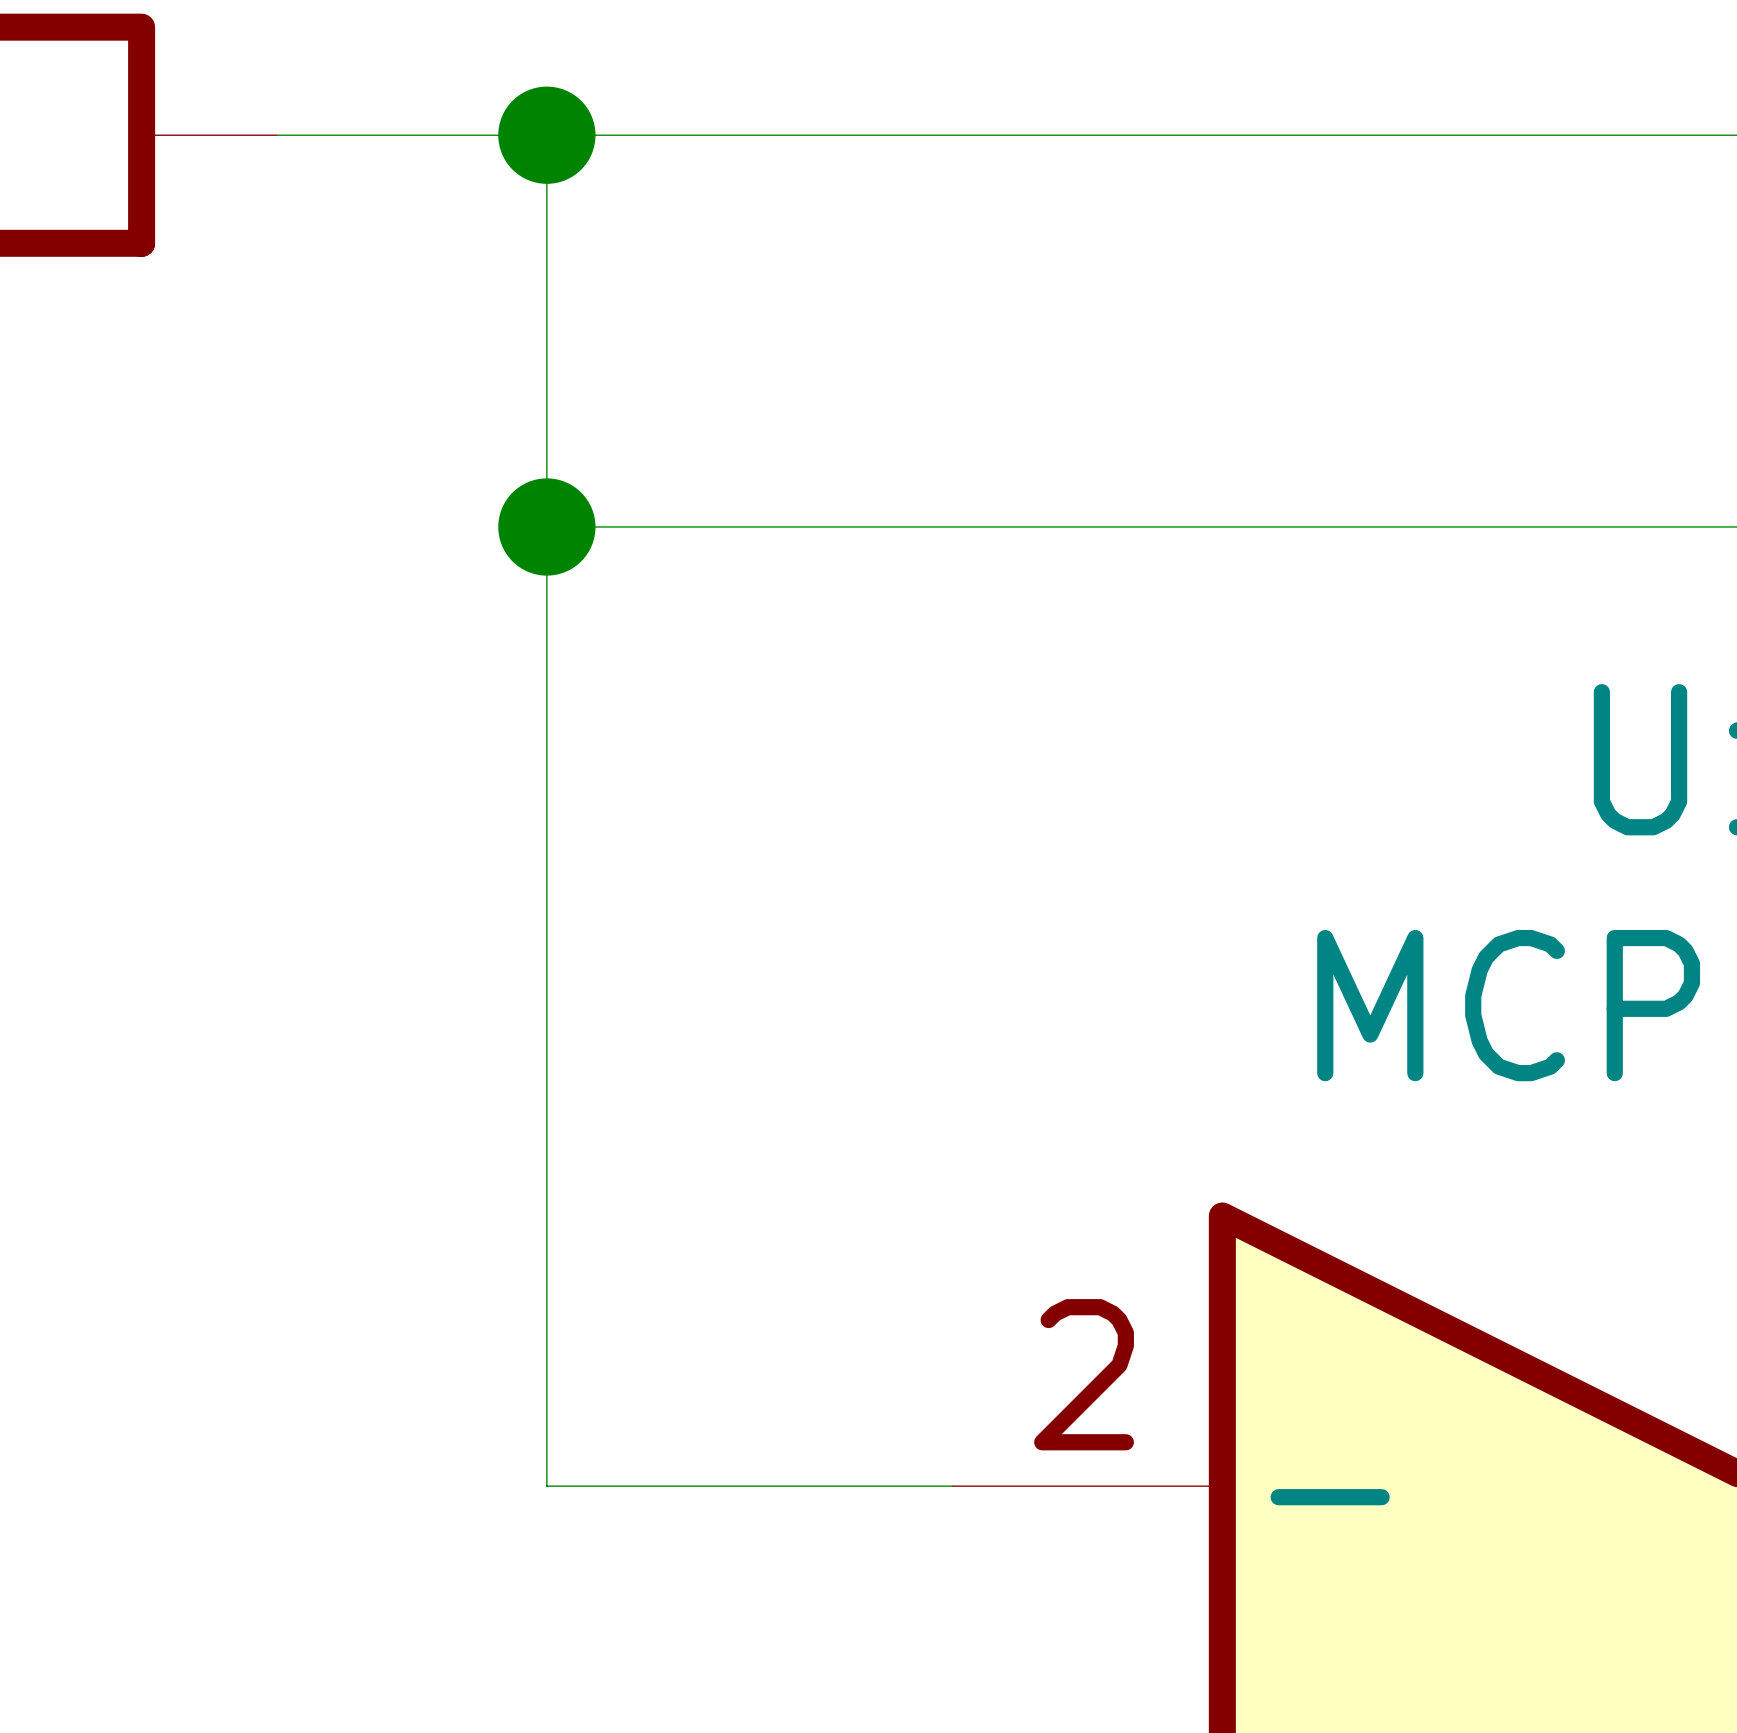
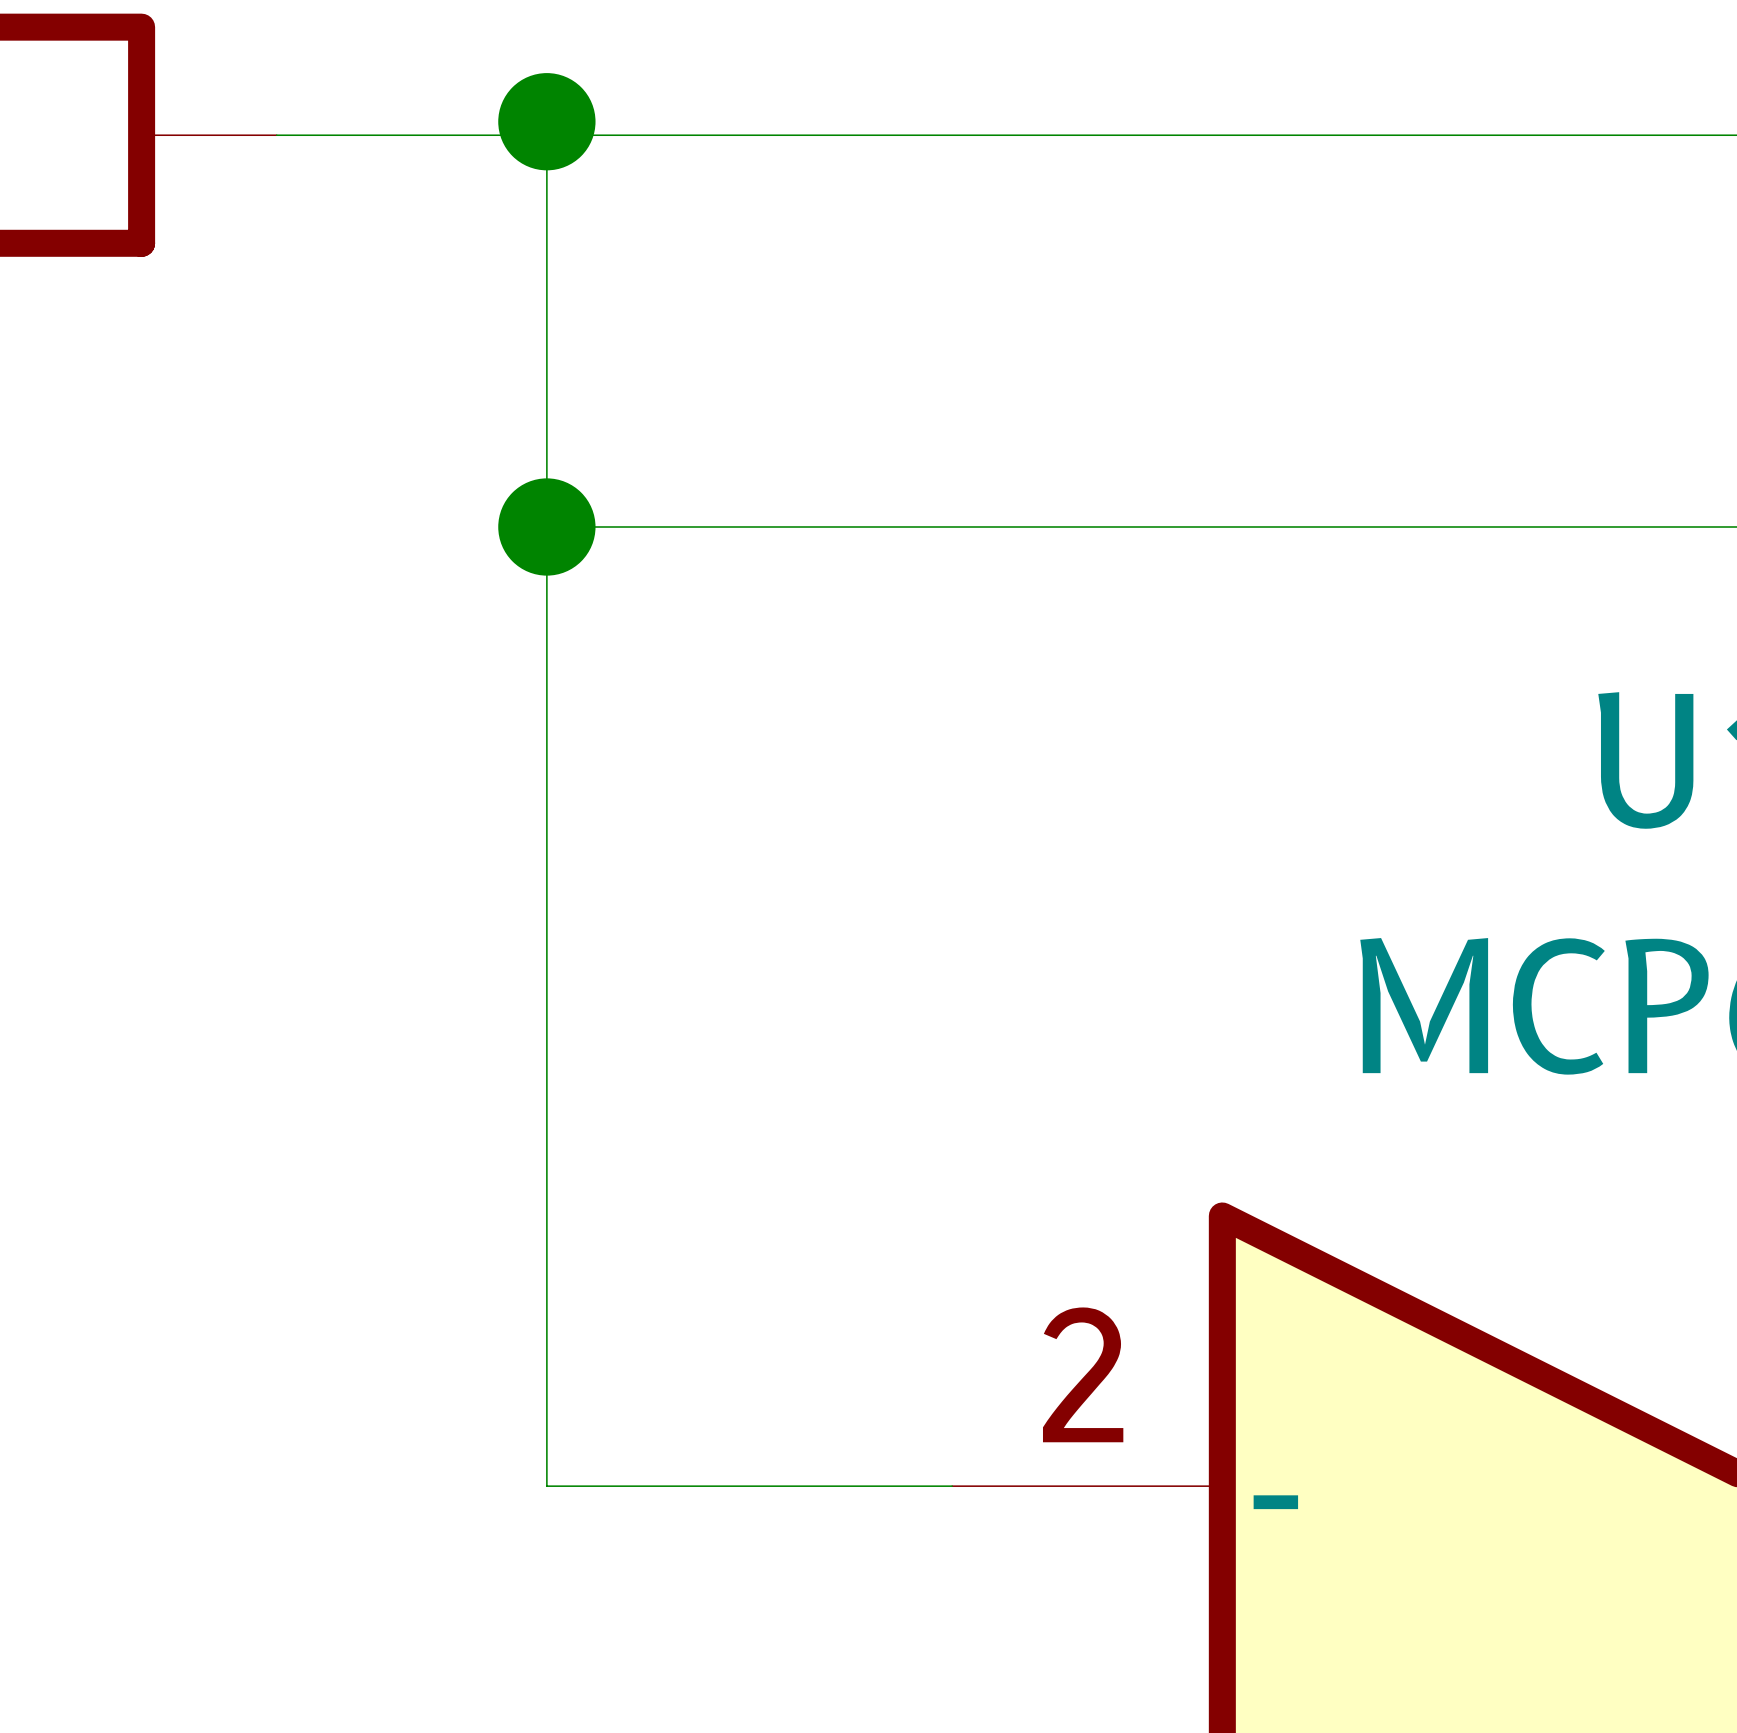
junction position: (546, 135) -> (546, 121)

